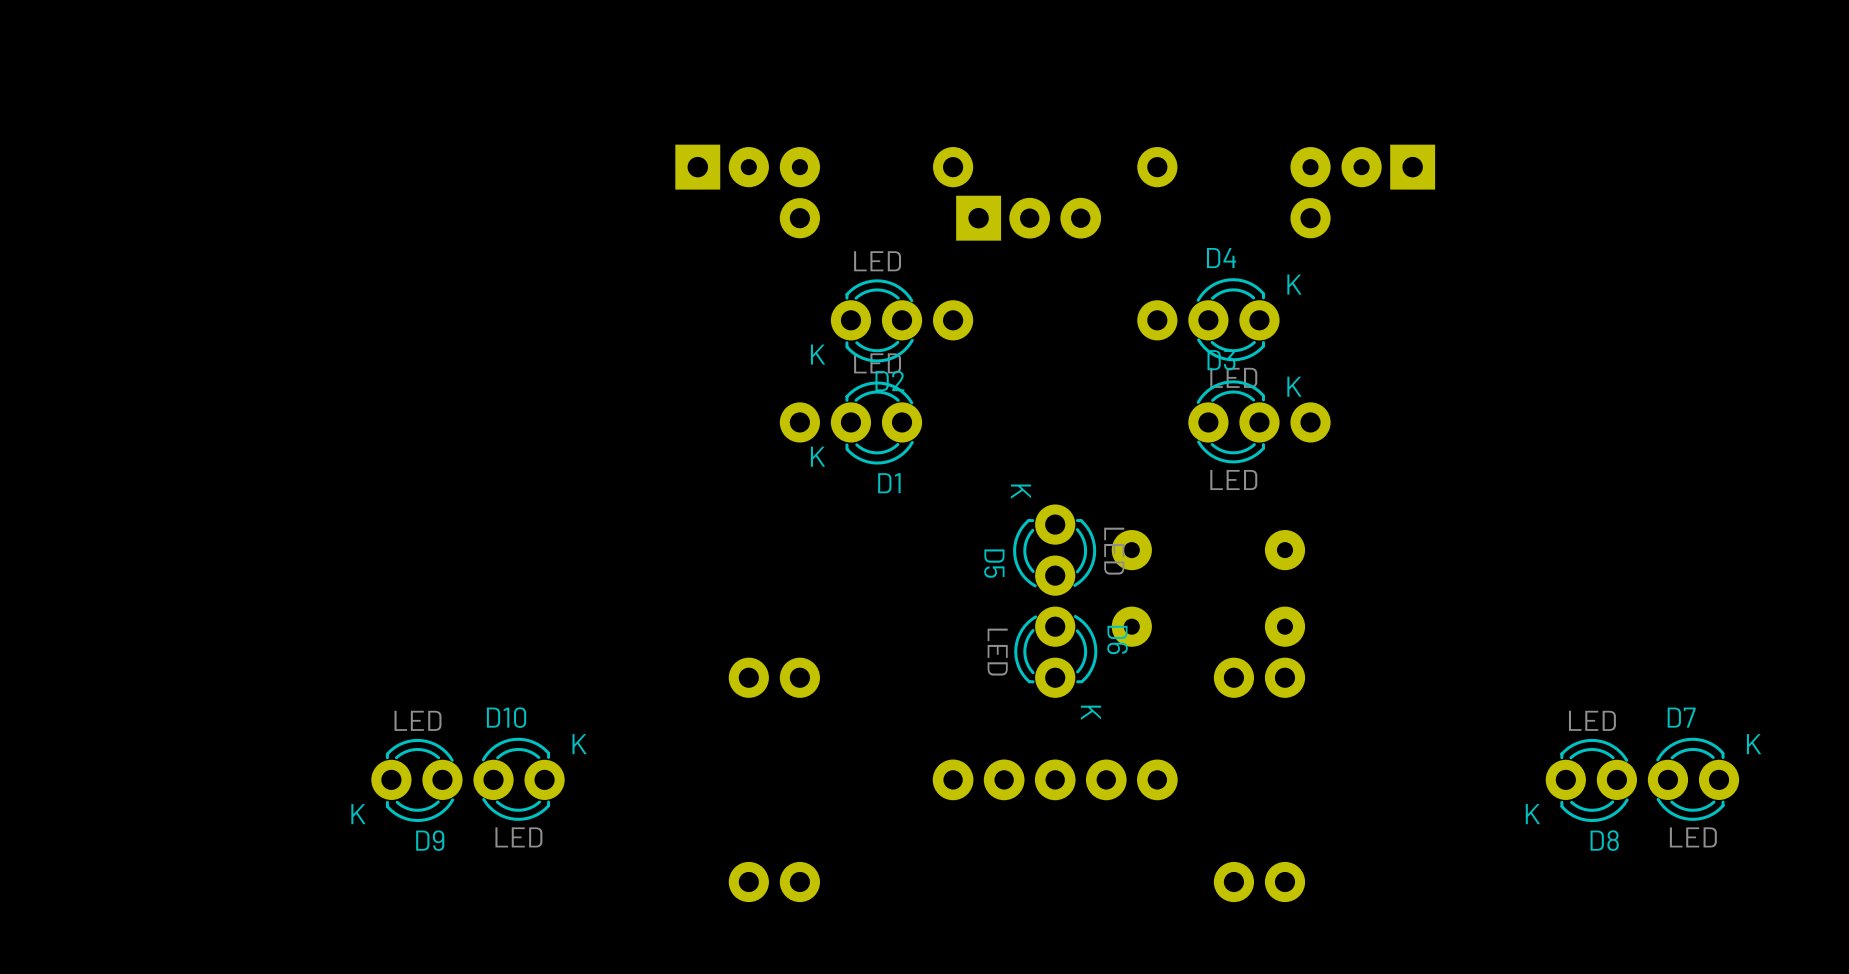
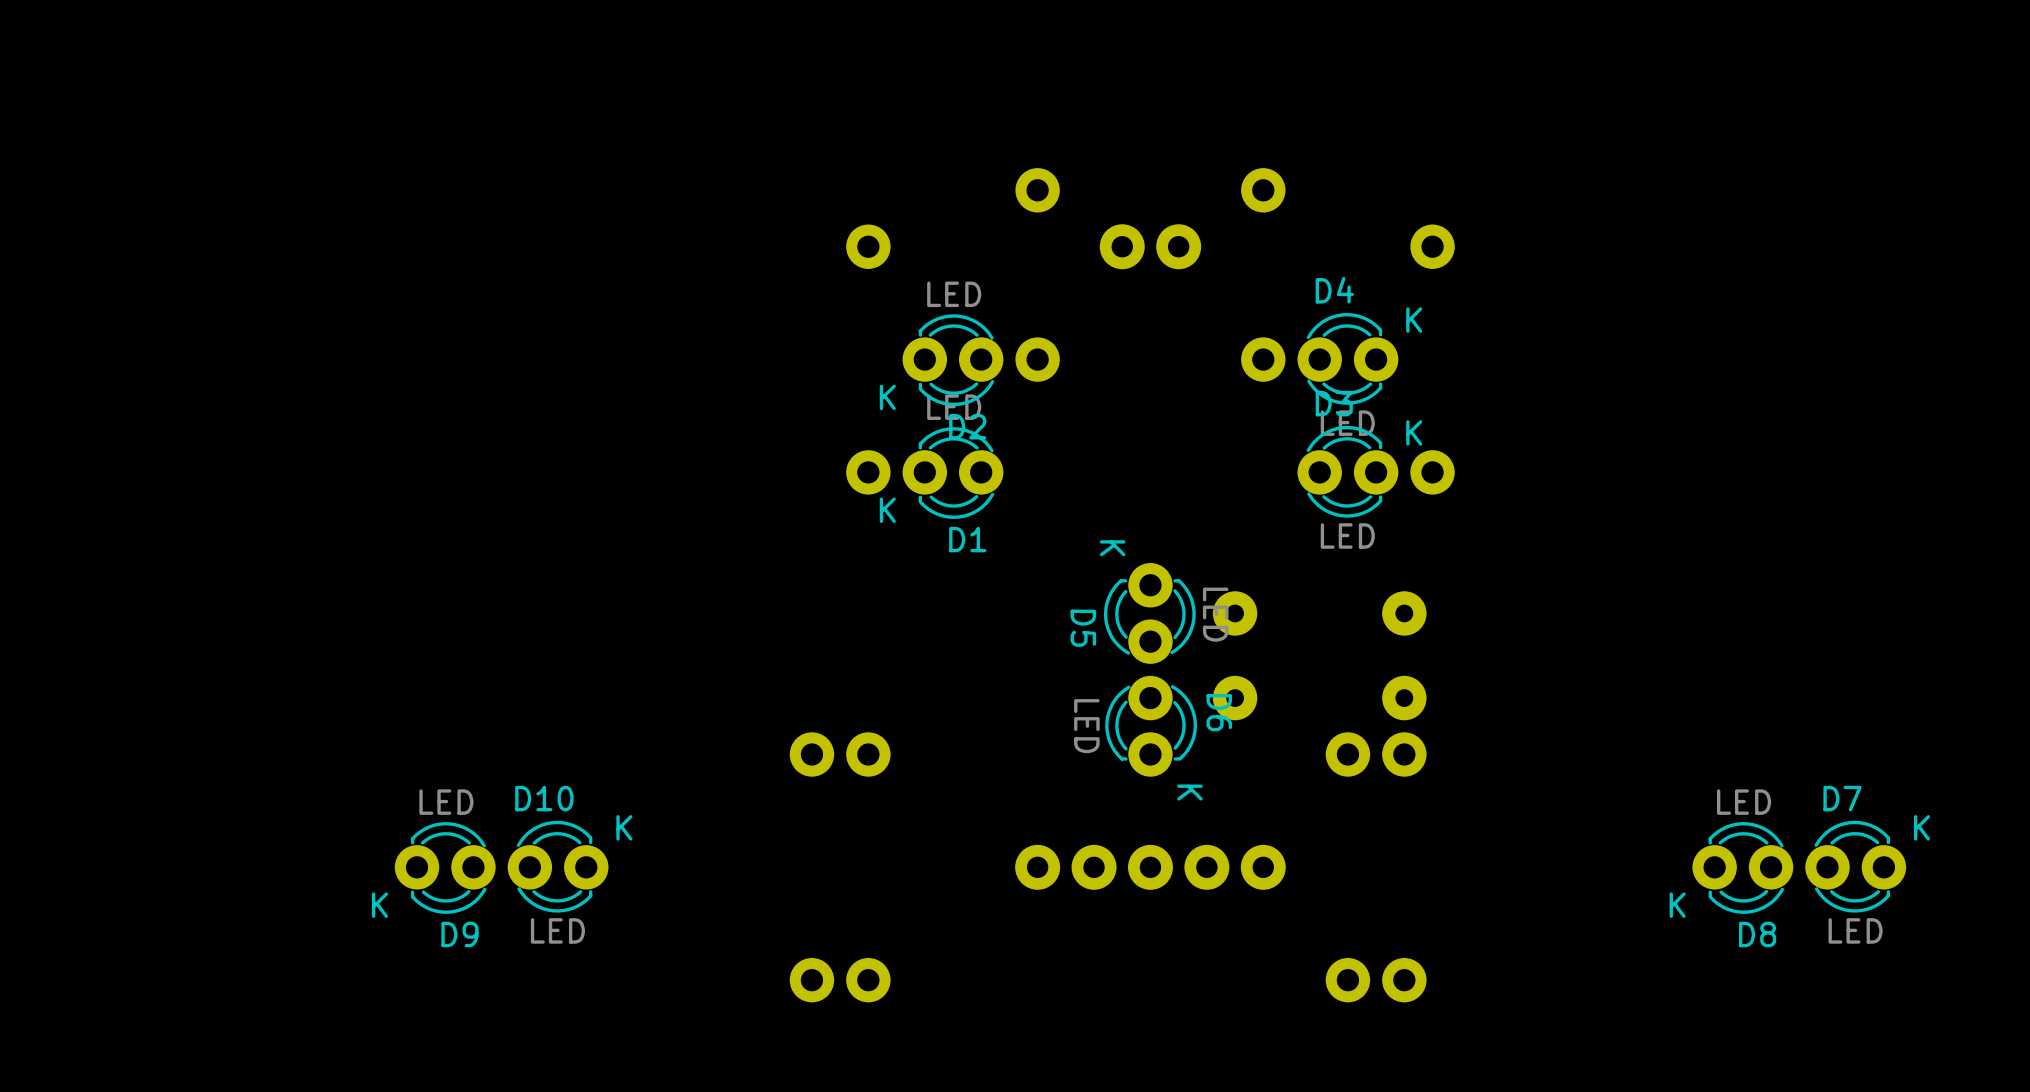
part: (697, 167) -> none
part: (774, 167) -> none
part: (1336, 167) -> none
part: (1412, 167) -> none
part: (978, 218) -> none

